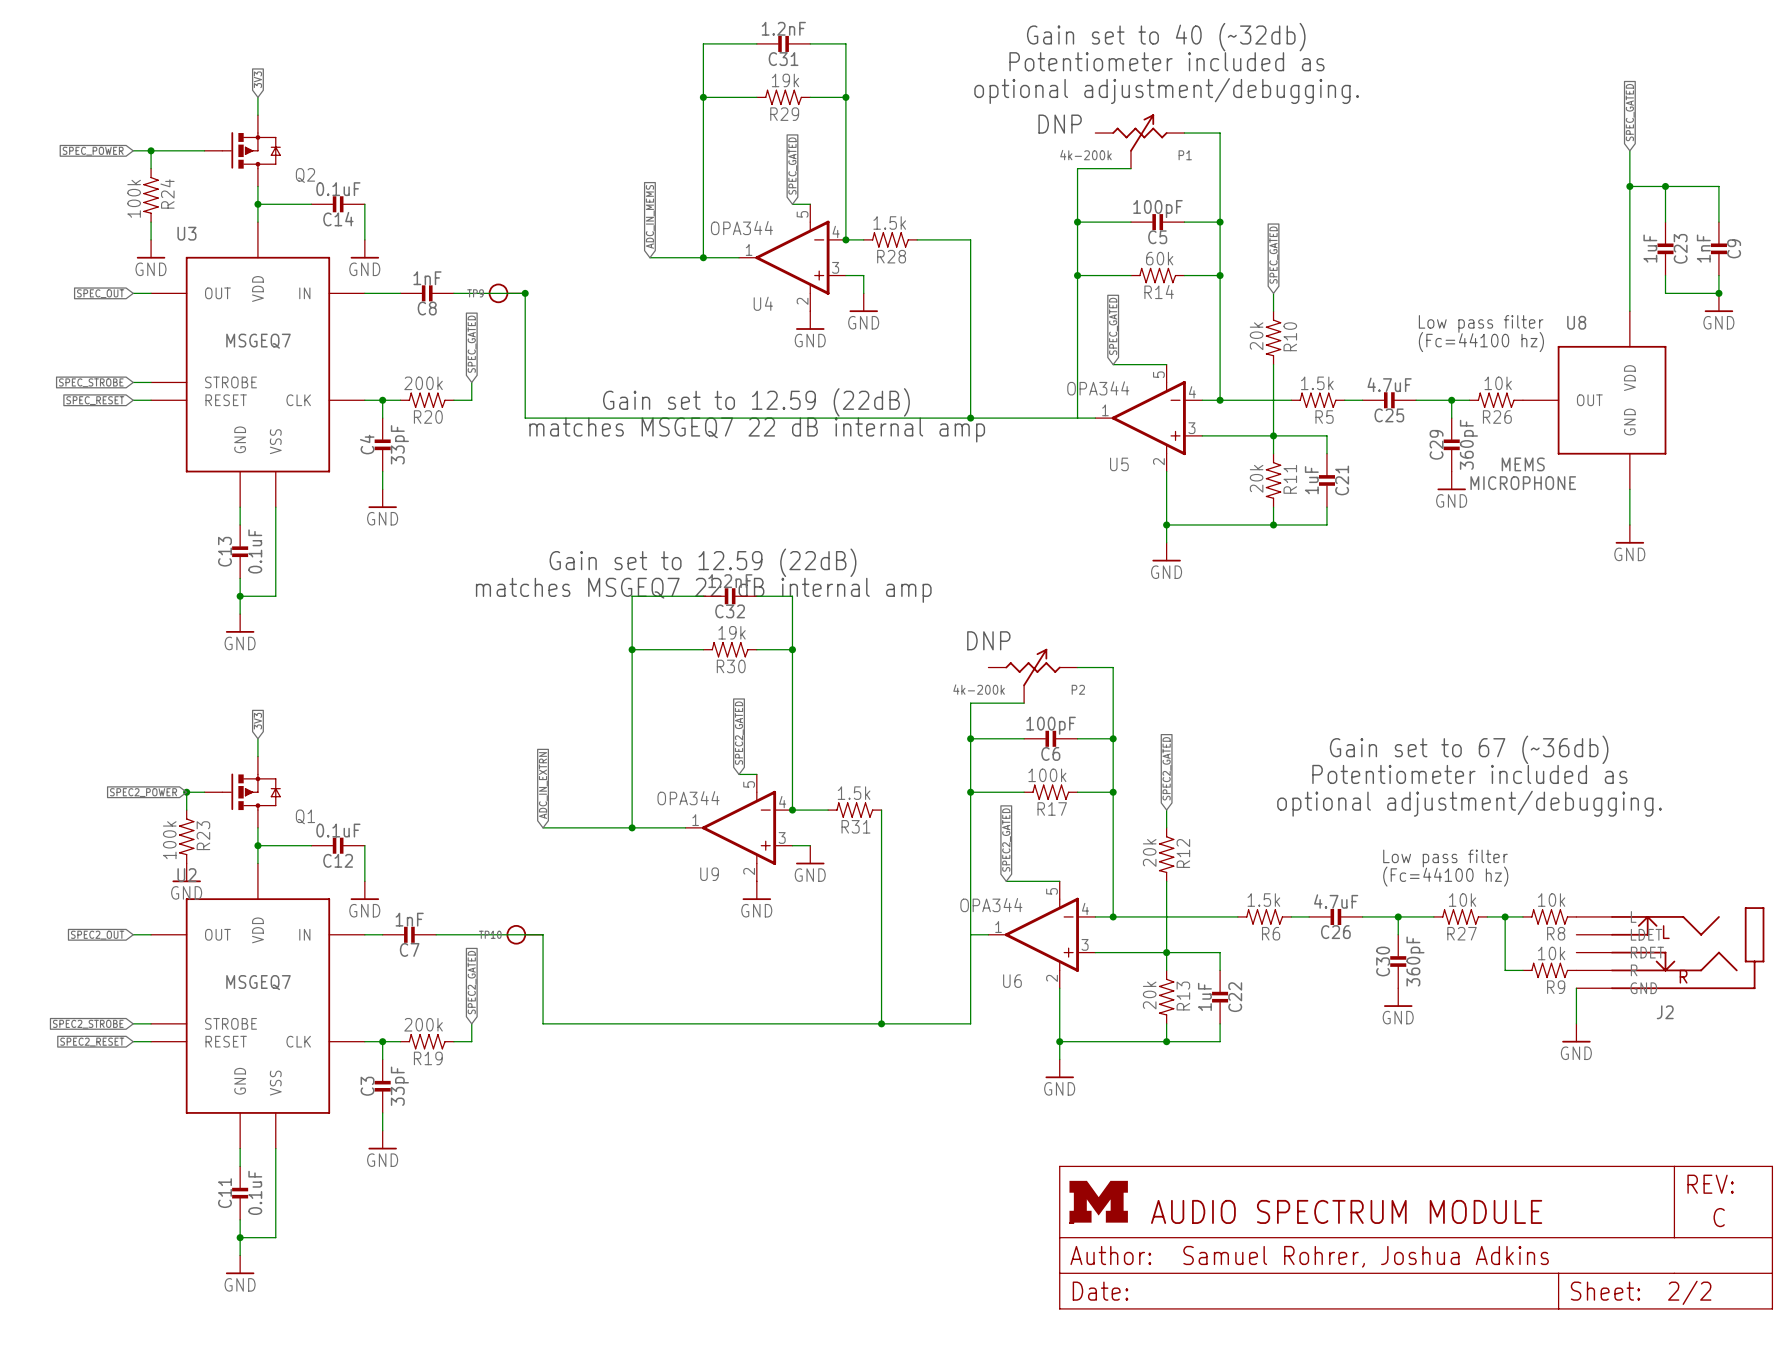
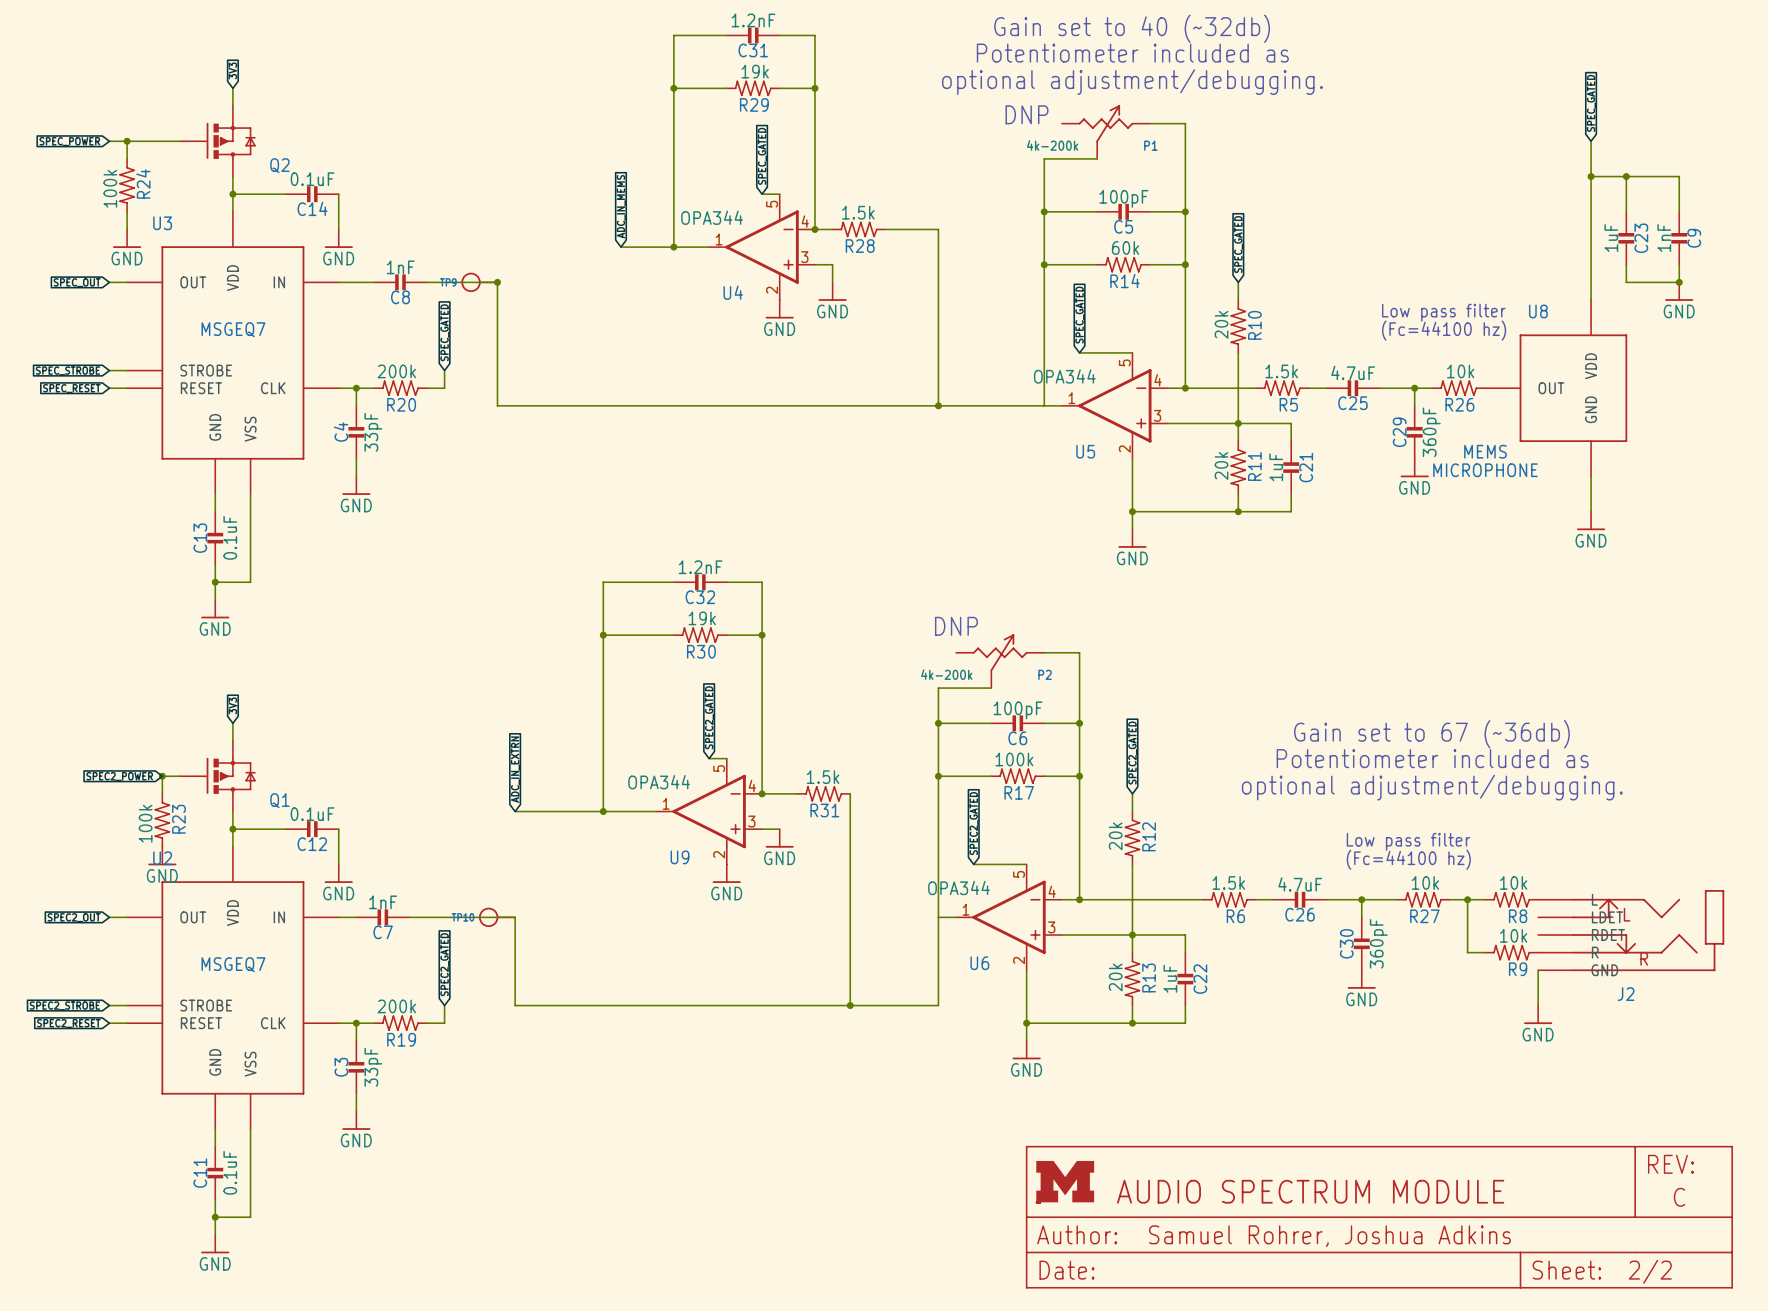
text: Gain set to 12.59 (22dB) (756, 402) -> none
text: matches MSGEQ7 22 dB internal amp (757, 429) -> none
text: Gain set to 12.59 (22dB) (703, 562) -> none
text: matches MSGEQ7 22 dB internal amp (703, 590) -> none

